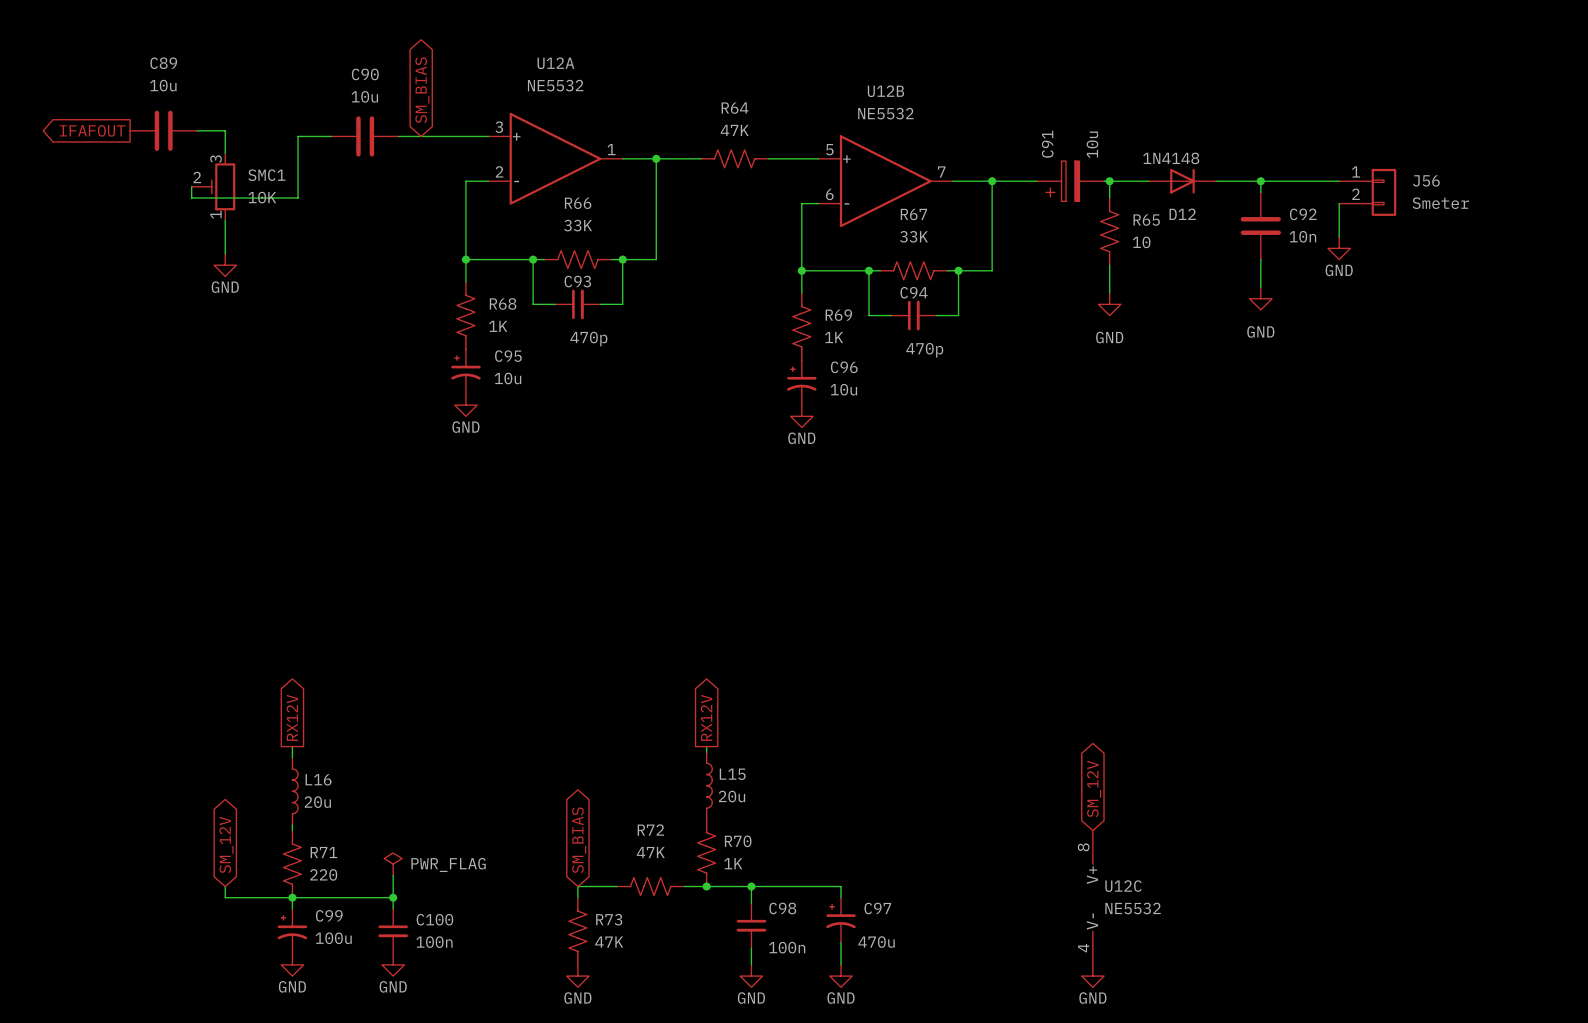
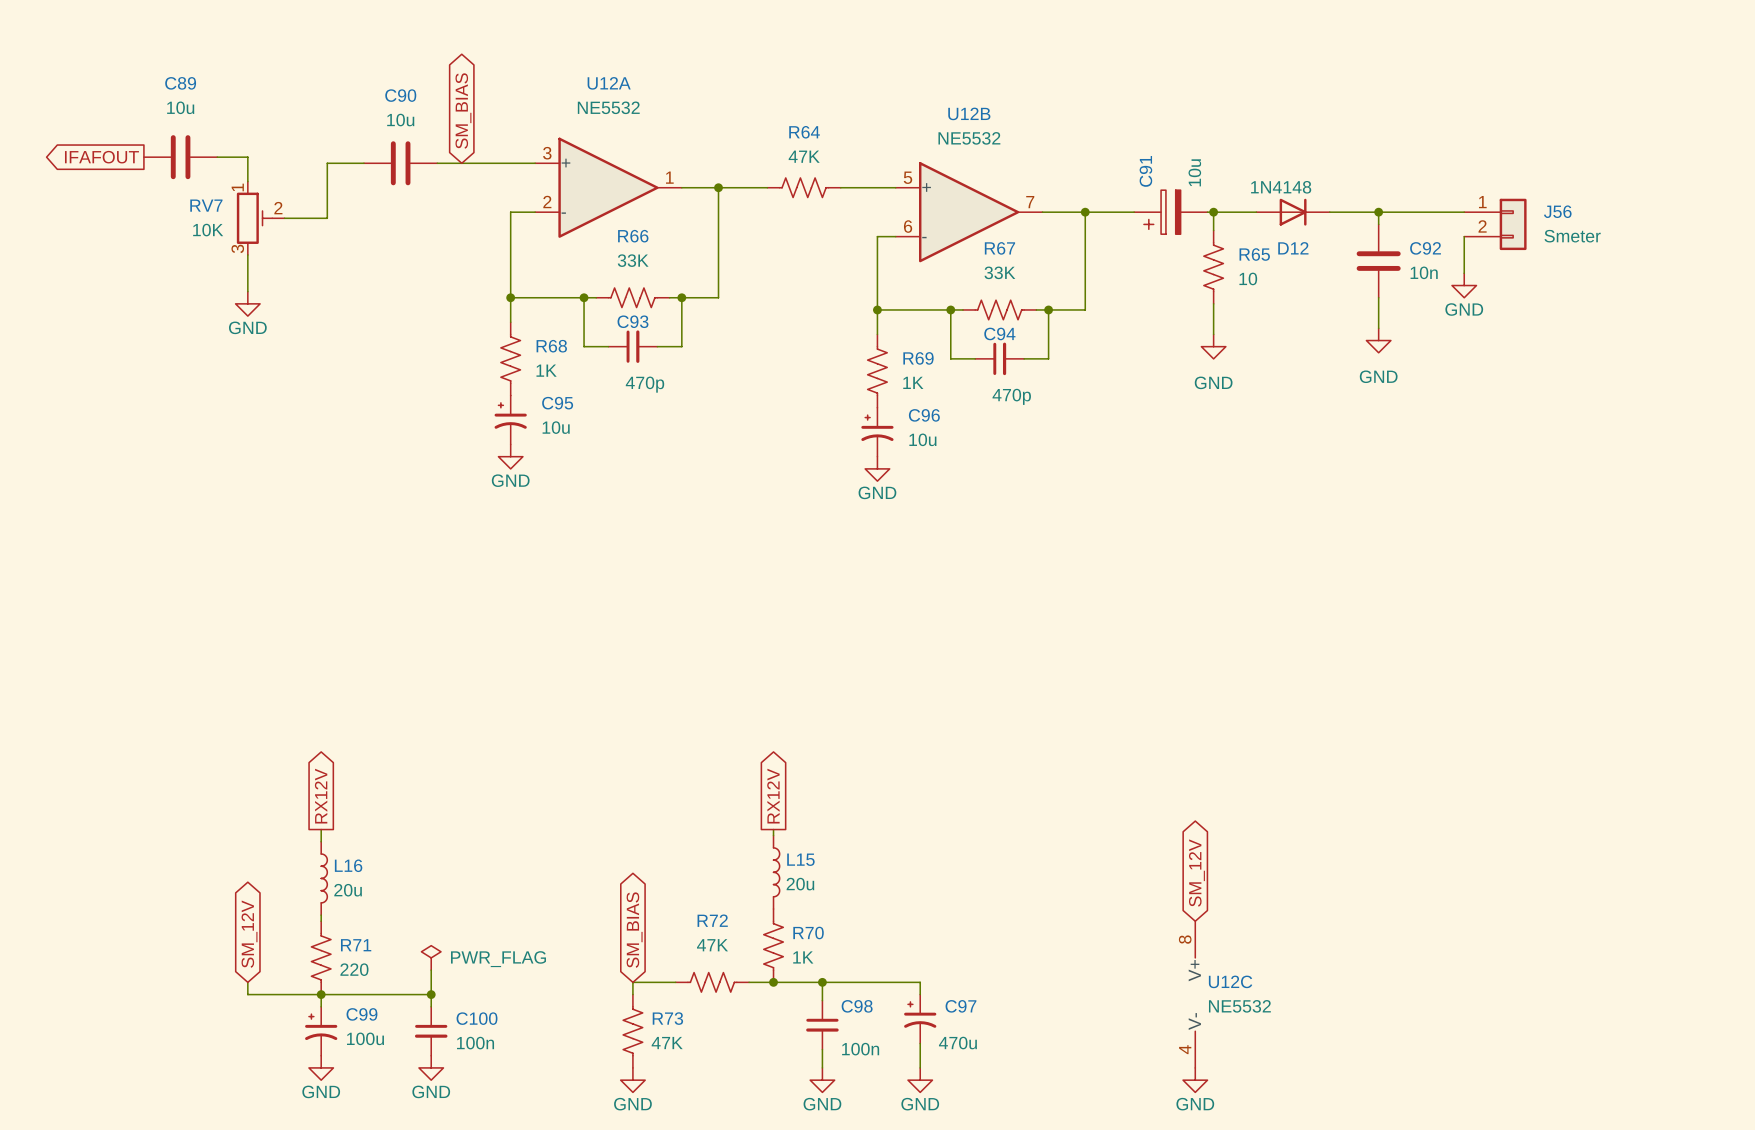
wire: (191, 186) (191, 198) (298, 198) (298, 186) -> (284, 218) (327, 218)
SMC1: 10K (213, 186) -> none
RV7: none -> 10K (260, 218)

